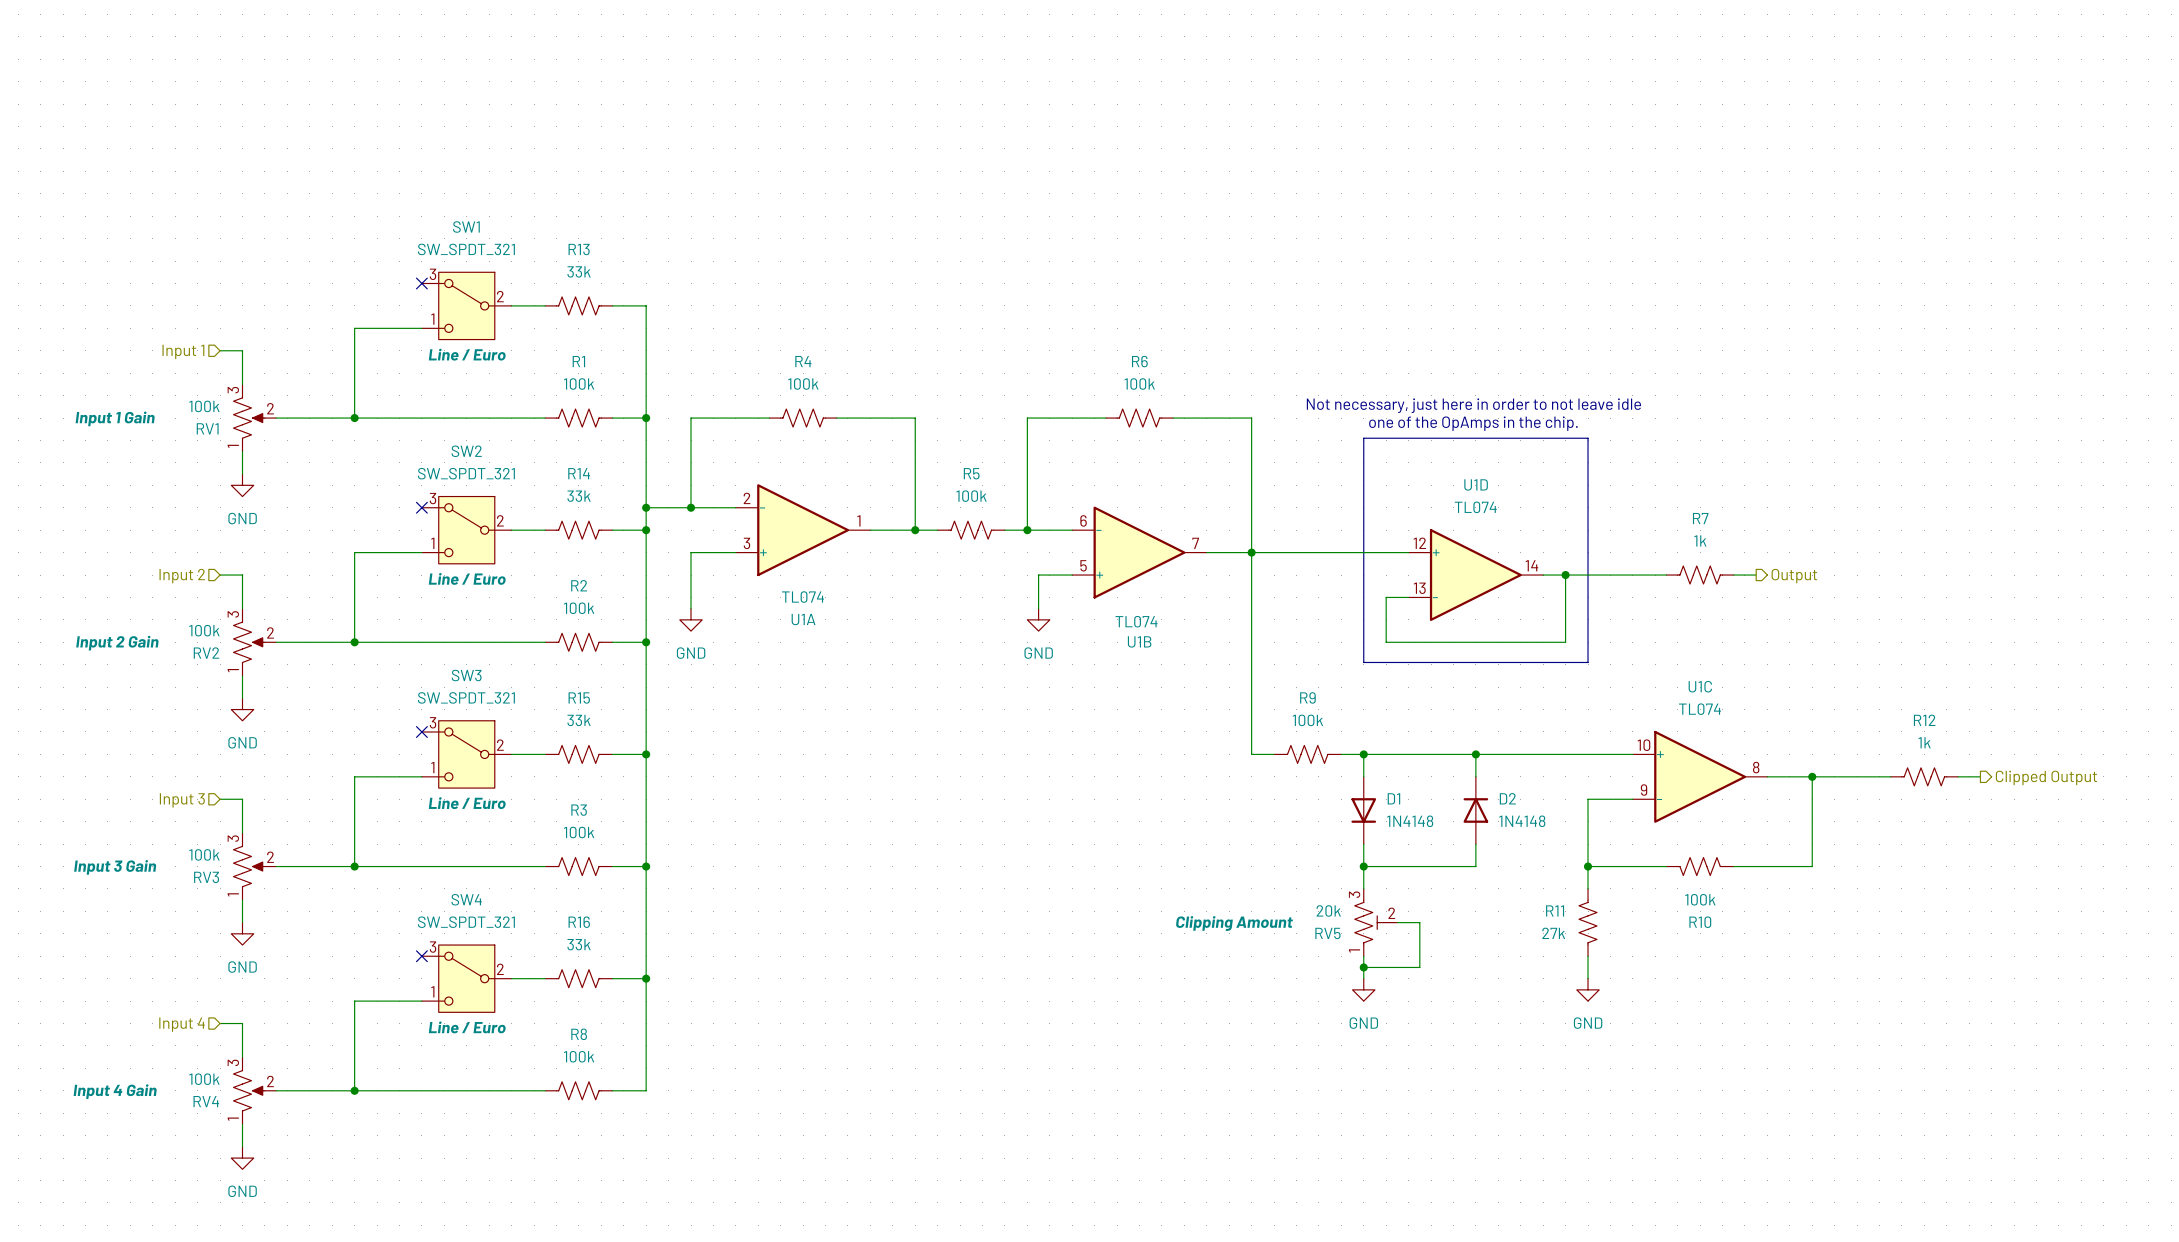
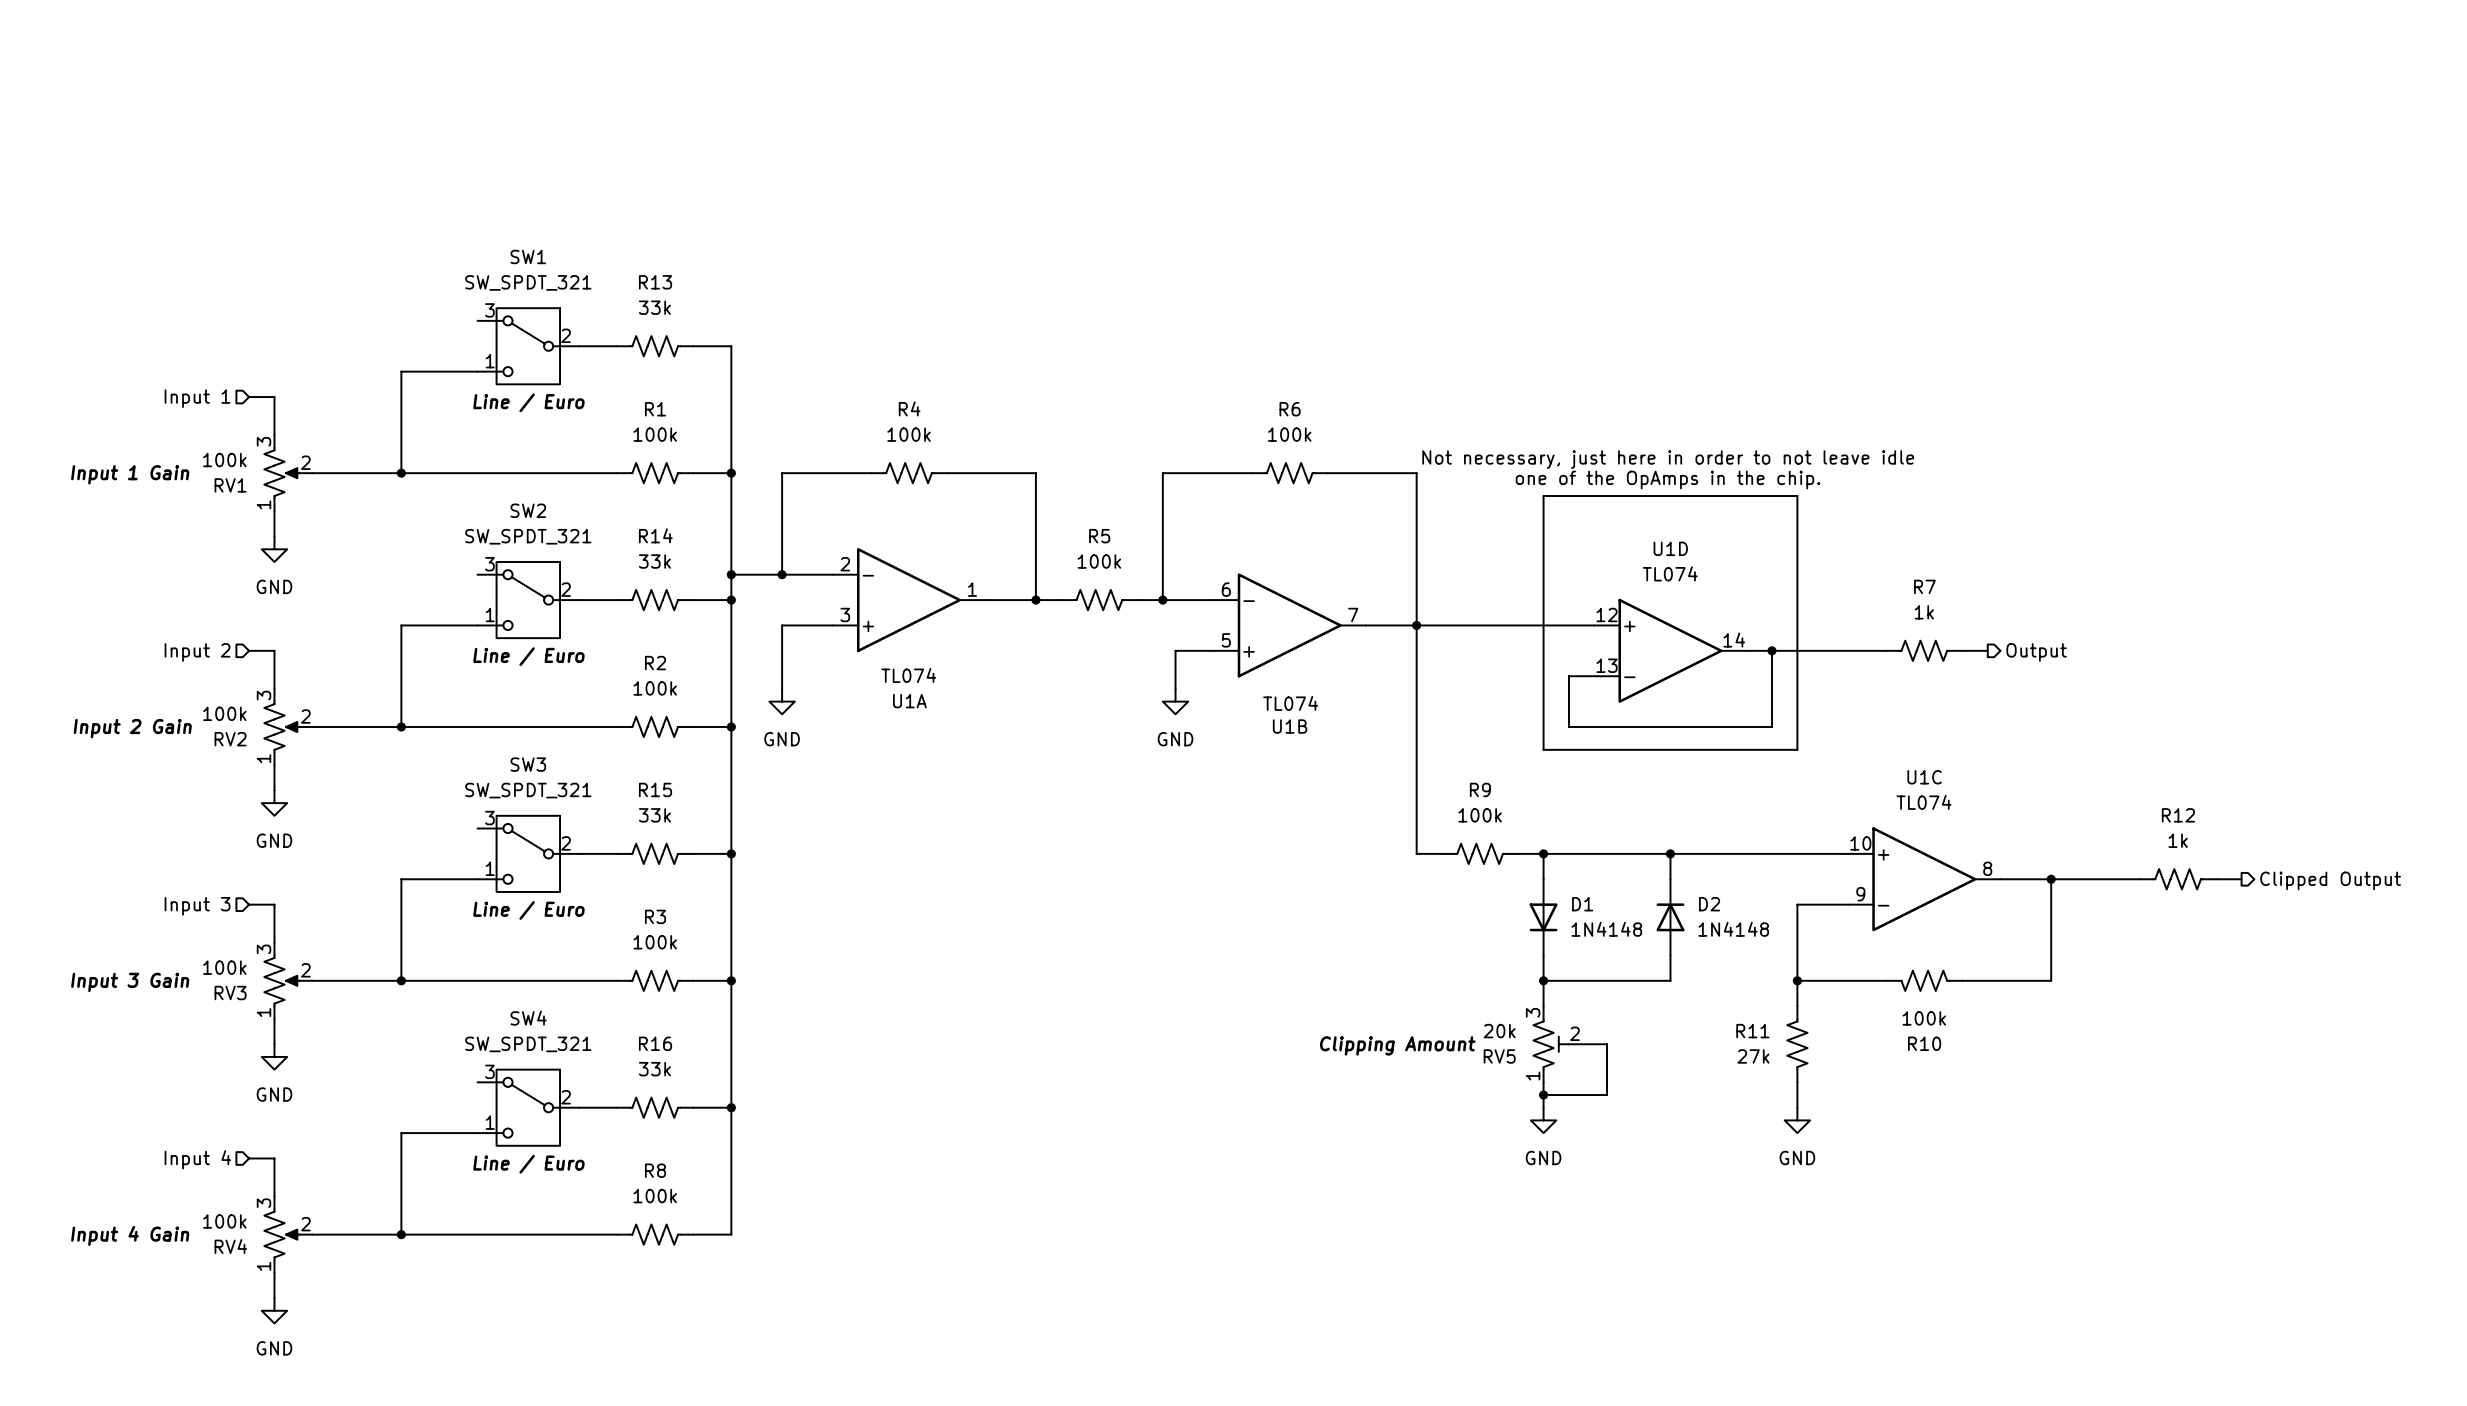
no-connect mark: (421, 283) -> none
no-connect mark: (421, 507) -> none
no-connect mark: (421, 731) -> none
no-connect mark: (421, 956) -> none

